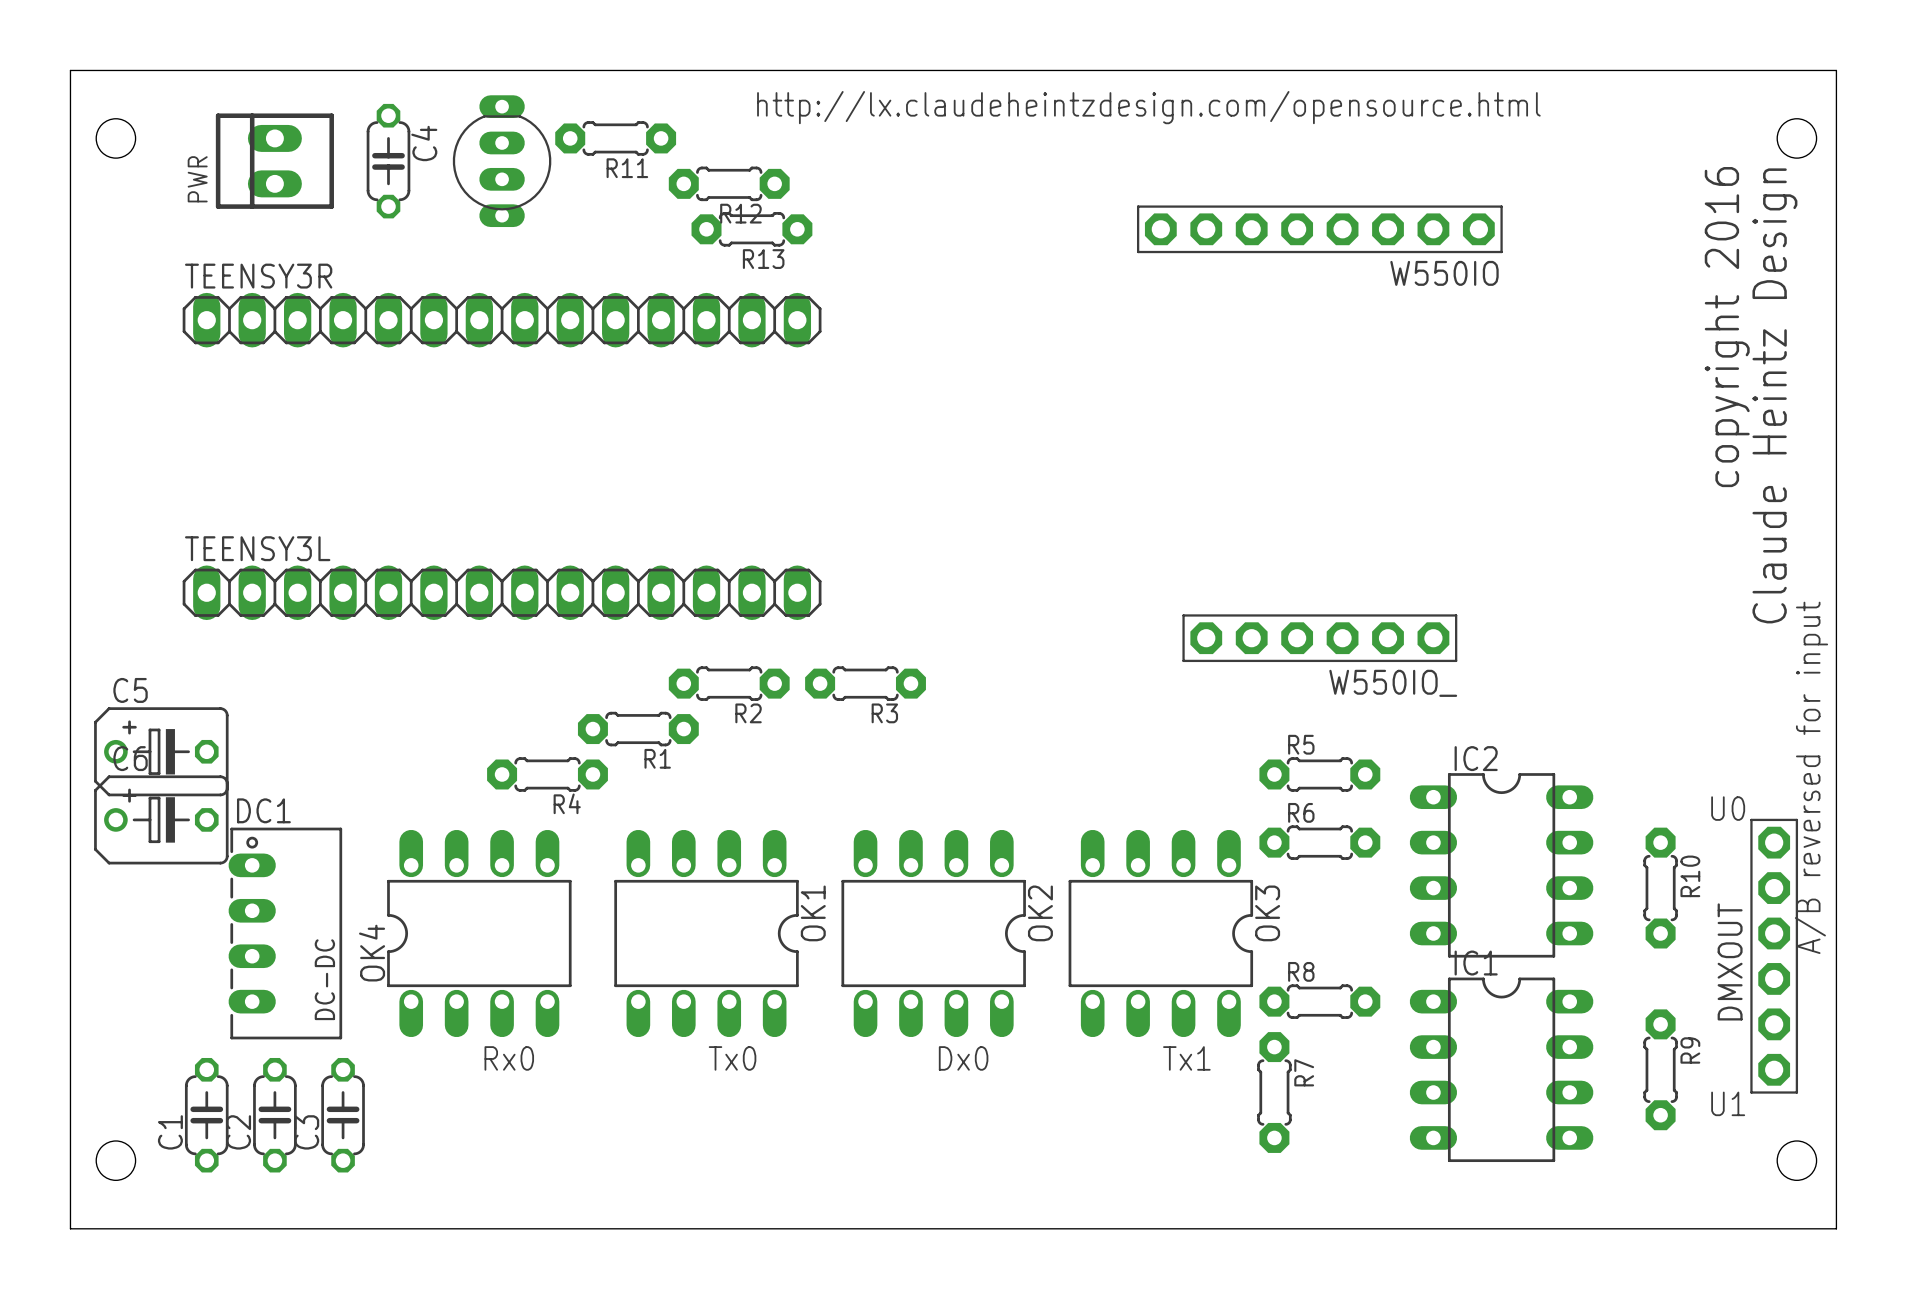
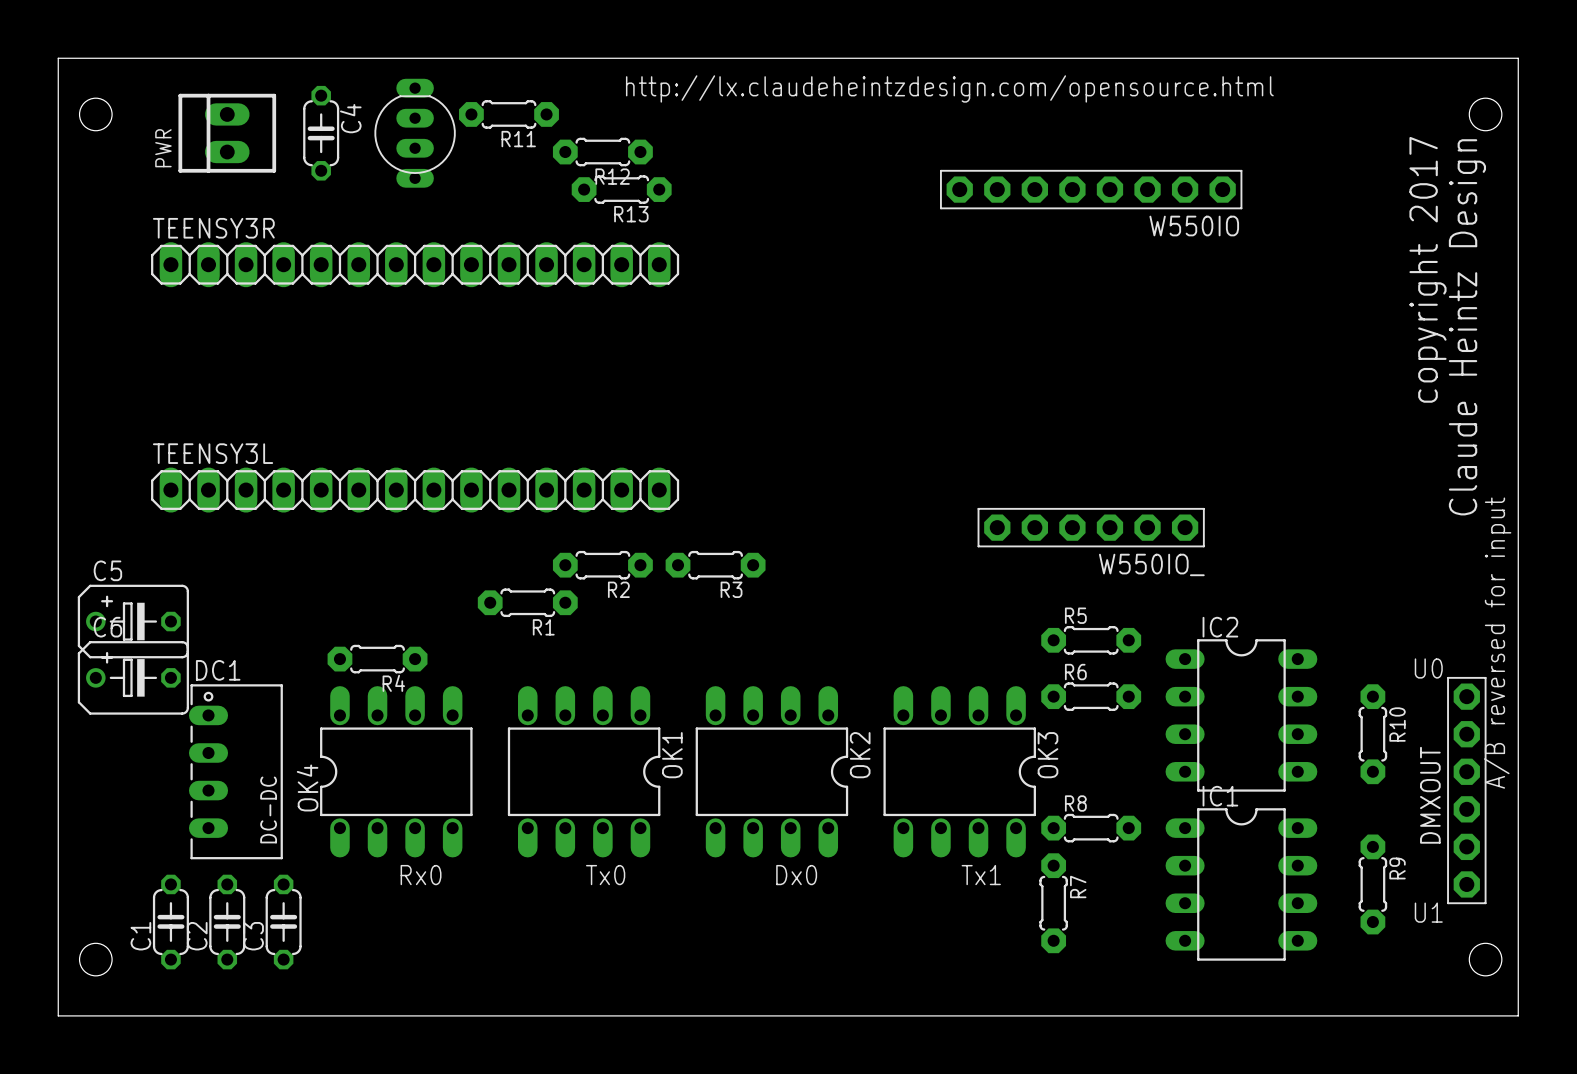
text: copyright 2016 (1727, 327) -> copyright 2017 (1427, 269)
R4 position: (547, 774) -> (377, 659)

